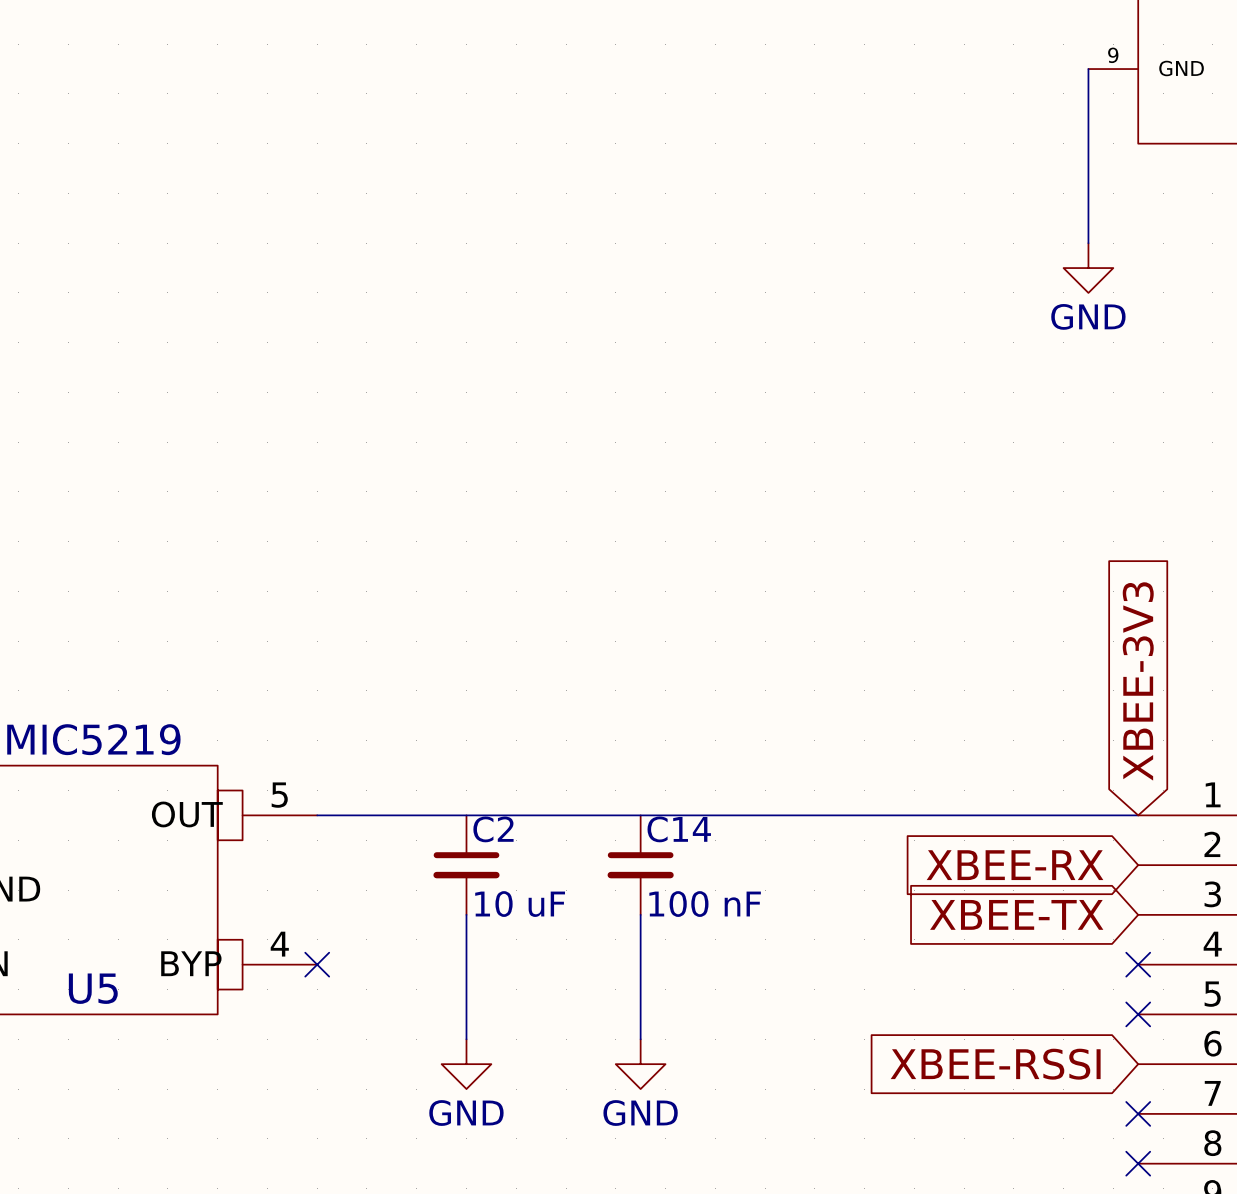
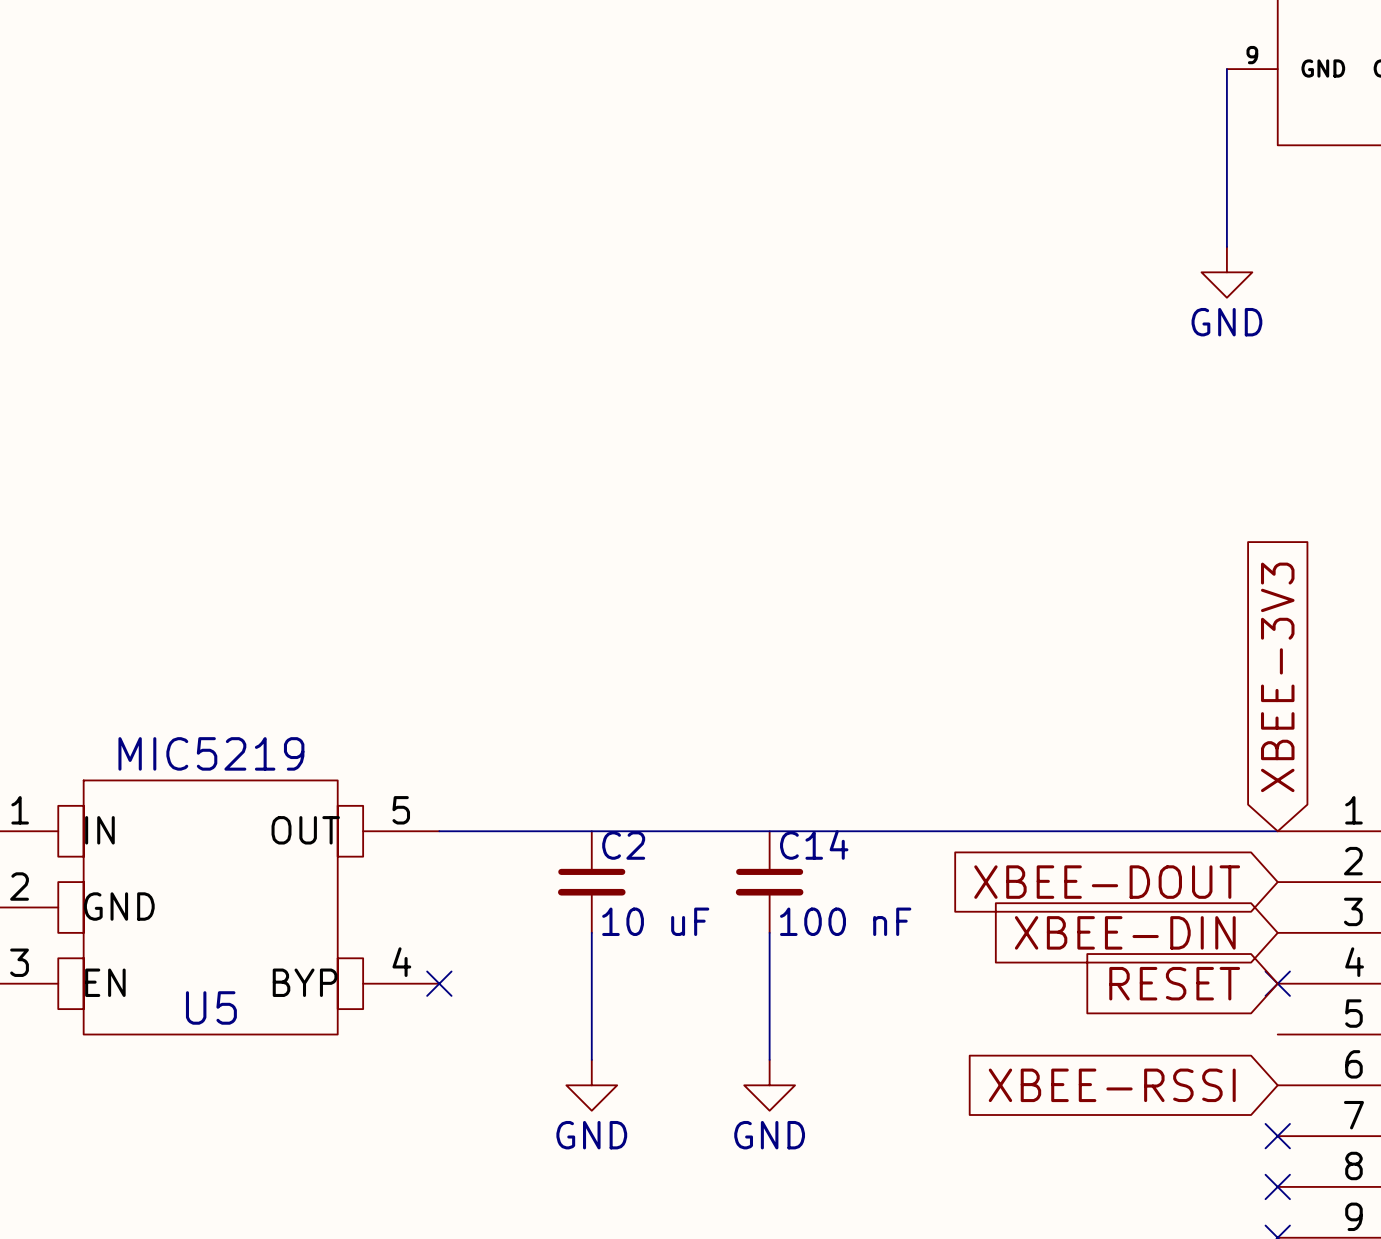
global label: XBEE-RX (1015, 865) -> XBEE-DOUT (1107, 882)
global label: XBEE-TX (1016, 914) -> XBEE-DIN (1125, 932)
global label: none -> RESET (1174, 983)
no-connect mark: (1138, 1014) -> none

